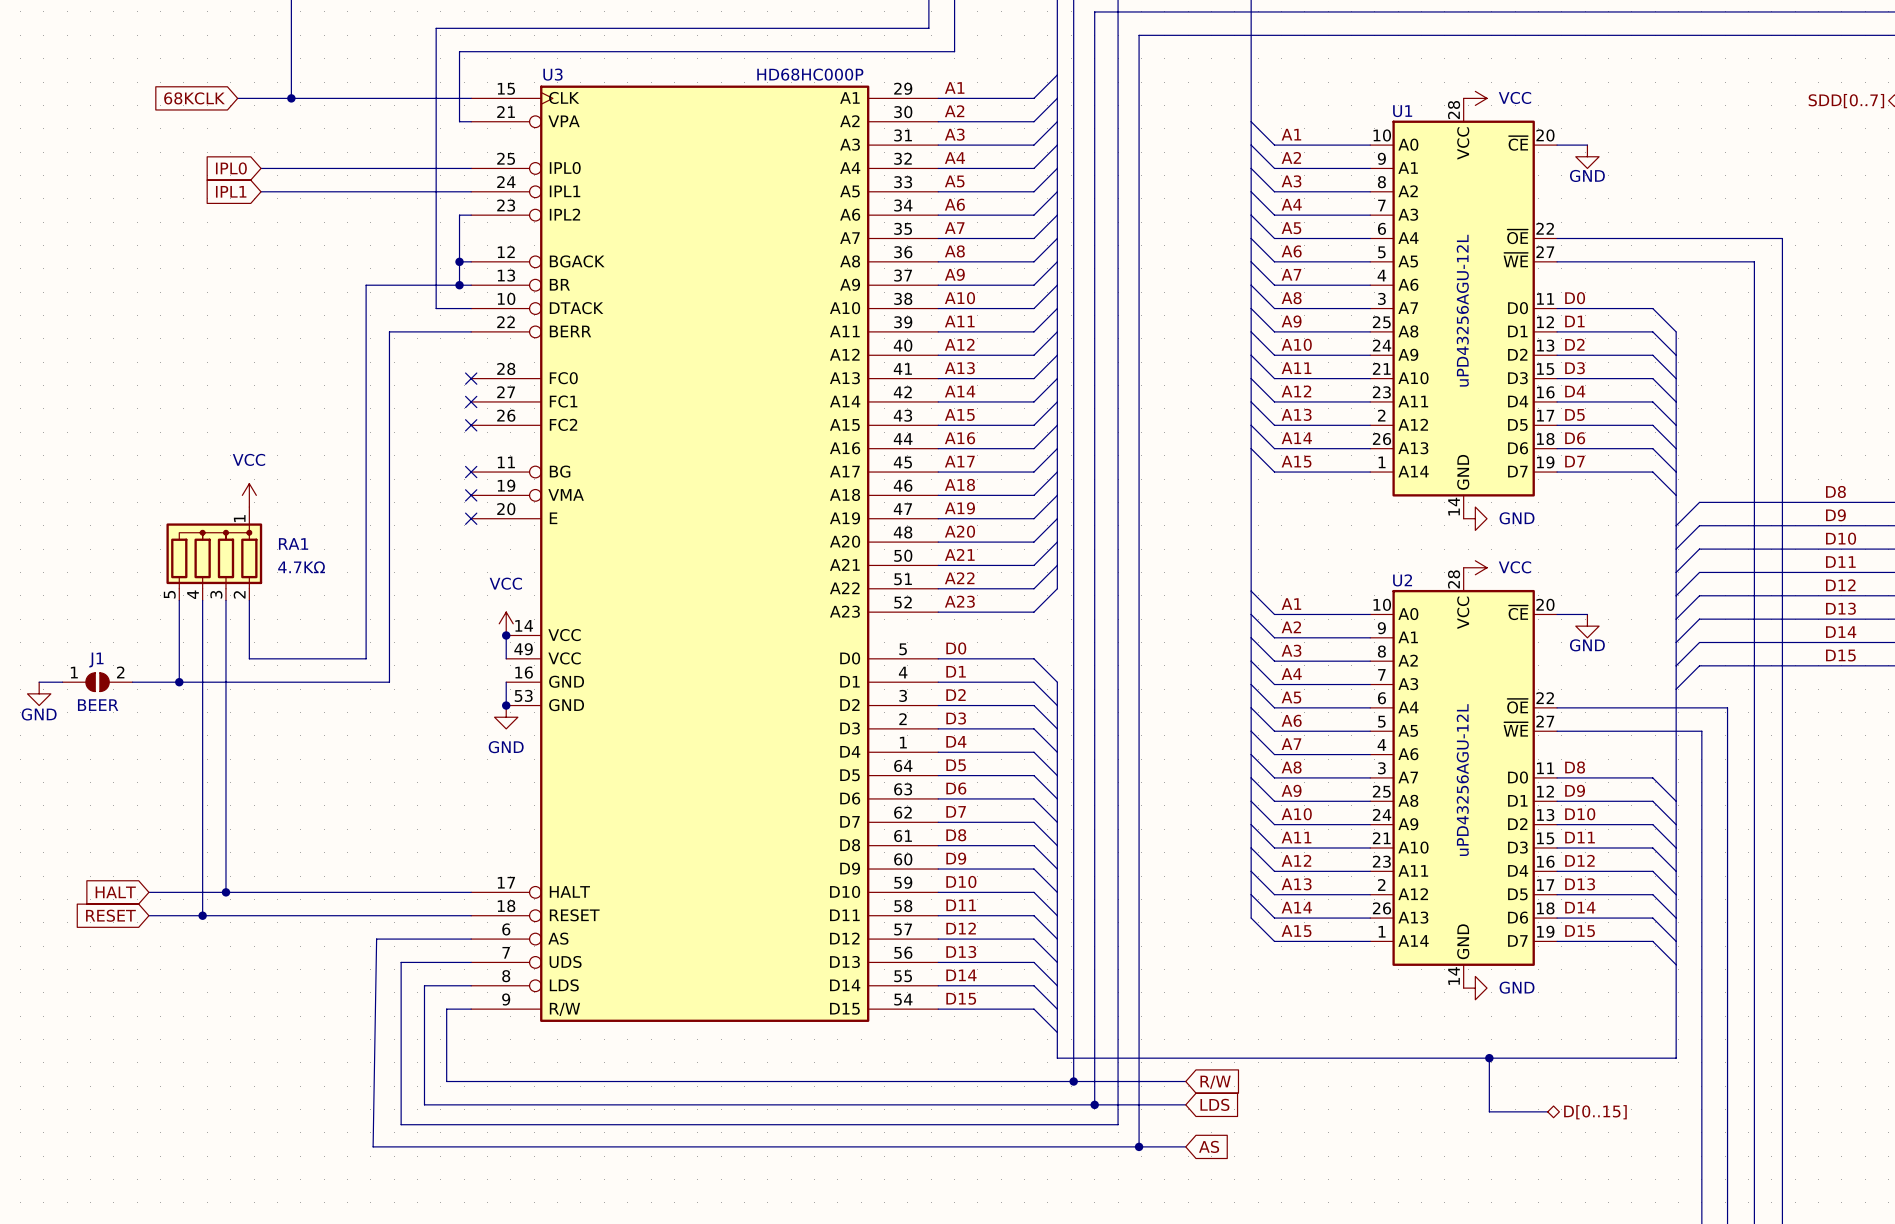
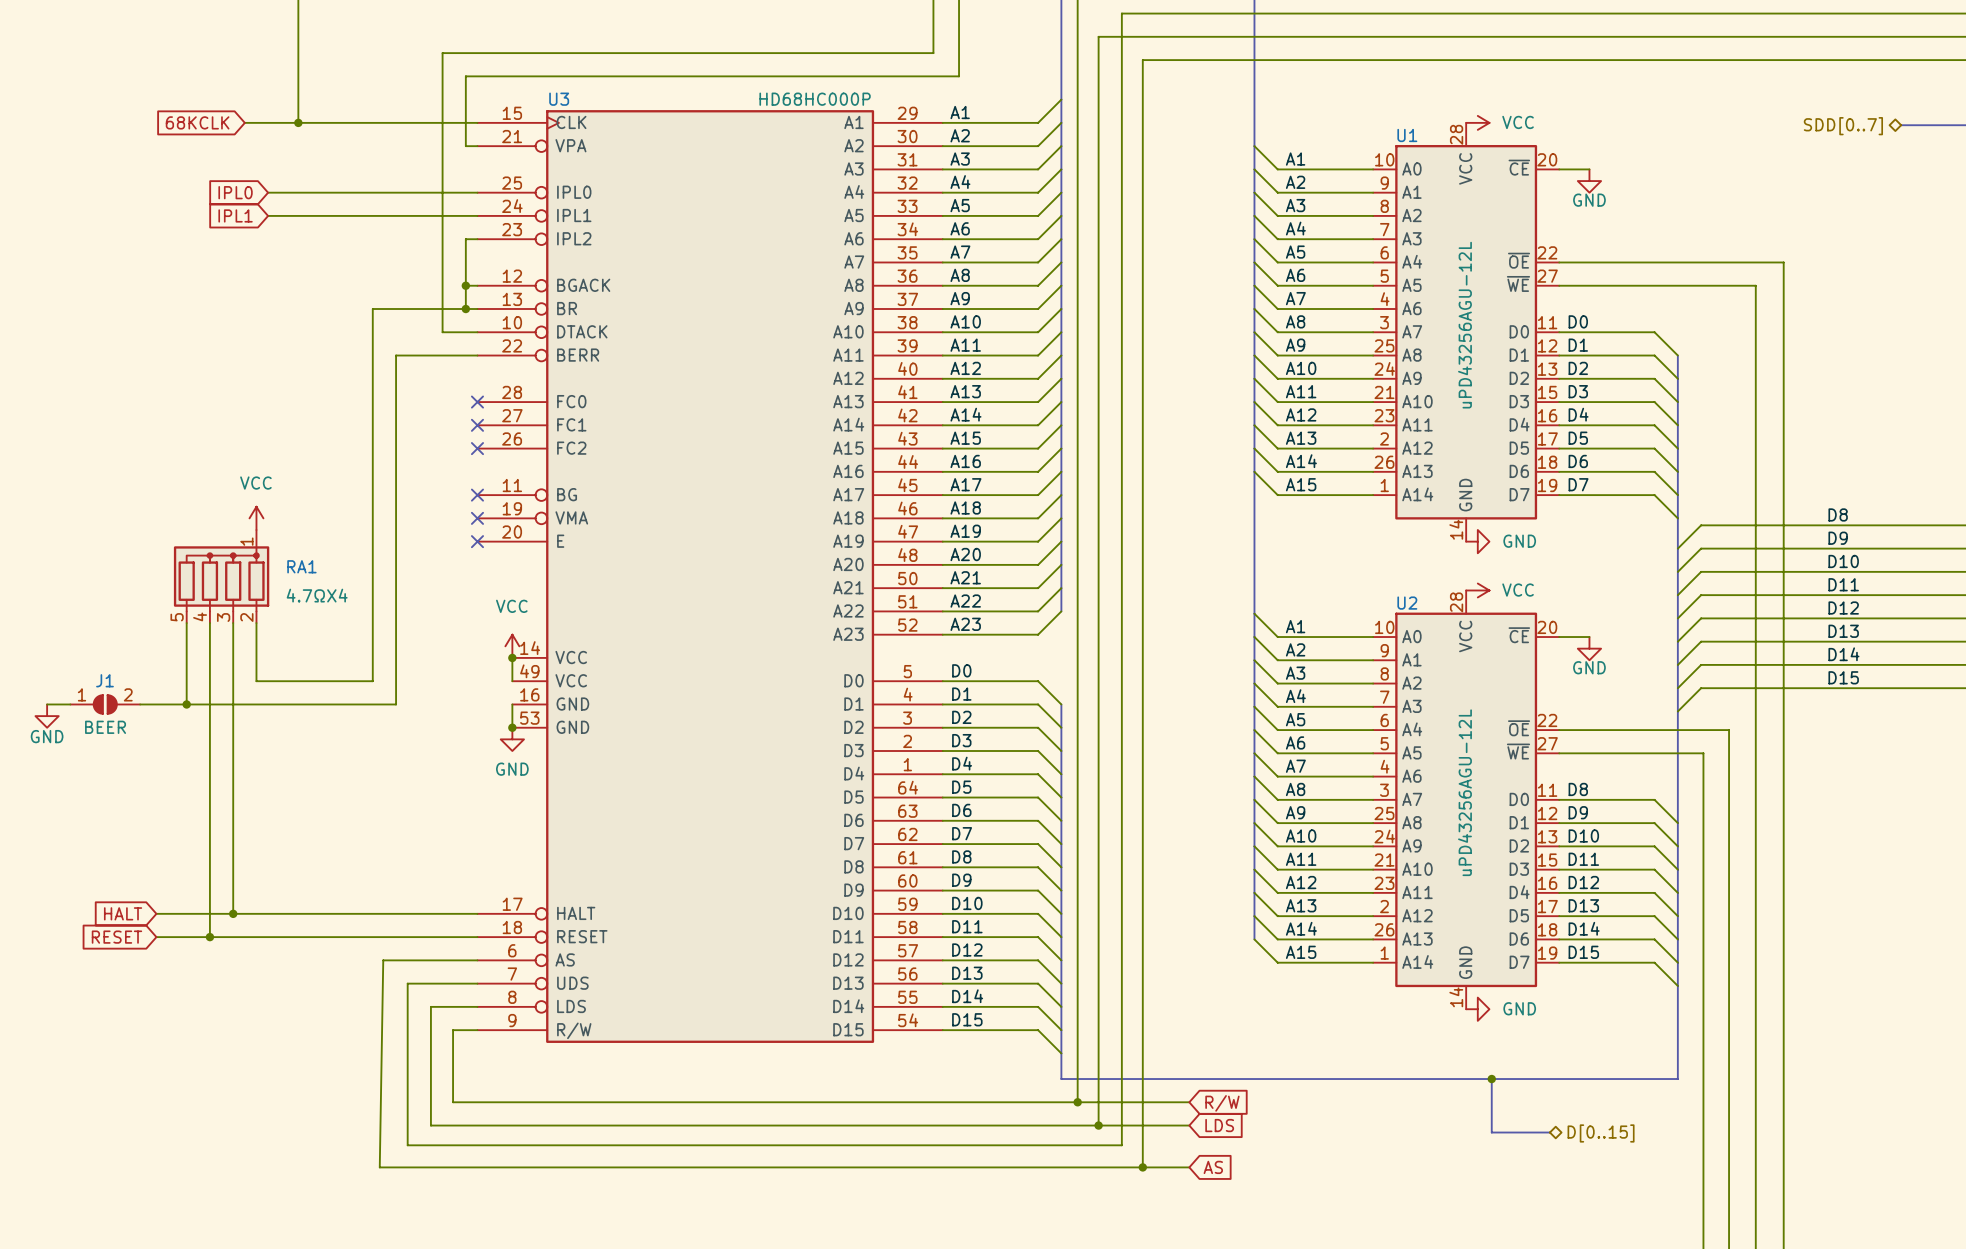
RA1 value: 4.7KΩ (301, 567) -> 4.7ΩX4 (317, 595)

